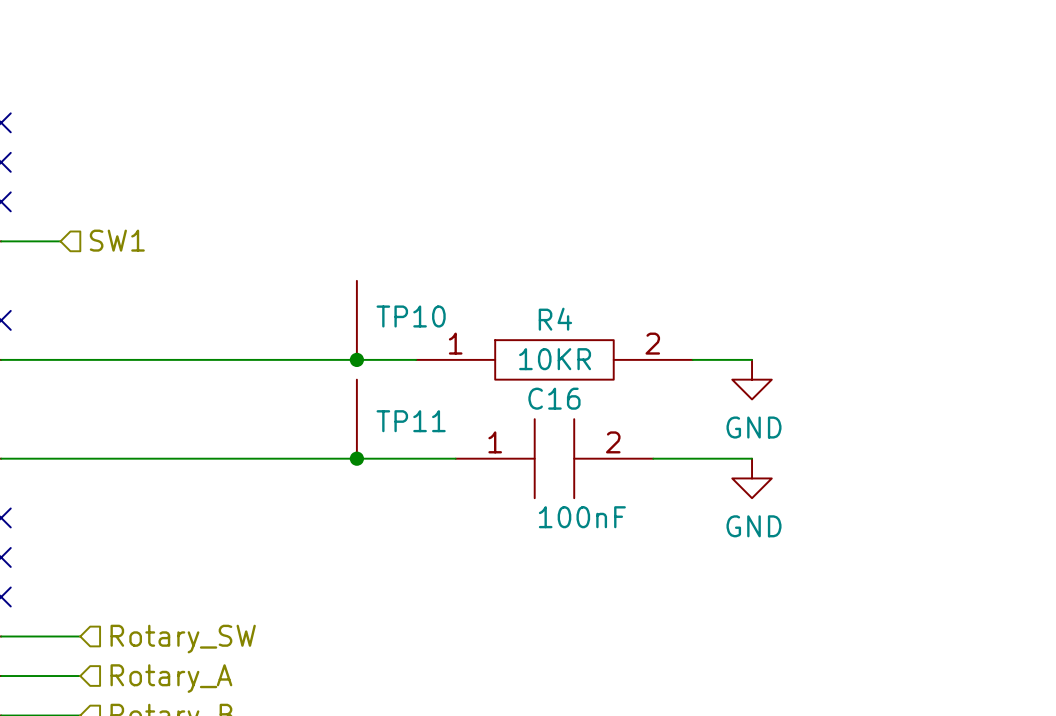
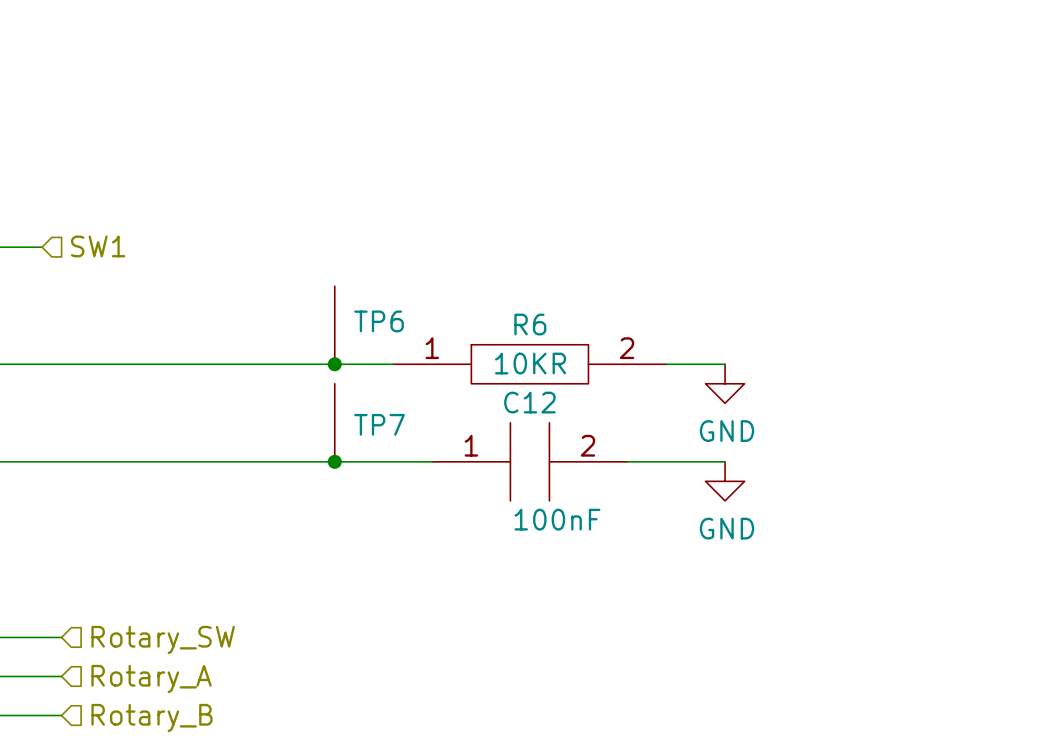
TP10 name: TP10 (411, 316) -> TP6 (379, 321)
R4 name: R4 (555, 319) -> R6 (530, 324)
C16 name: C16 (554, 398) -> C12 (529, 402)
TP11 name: TP11 (411, 421) -> TP7 (379, 424)

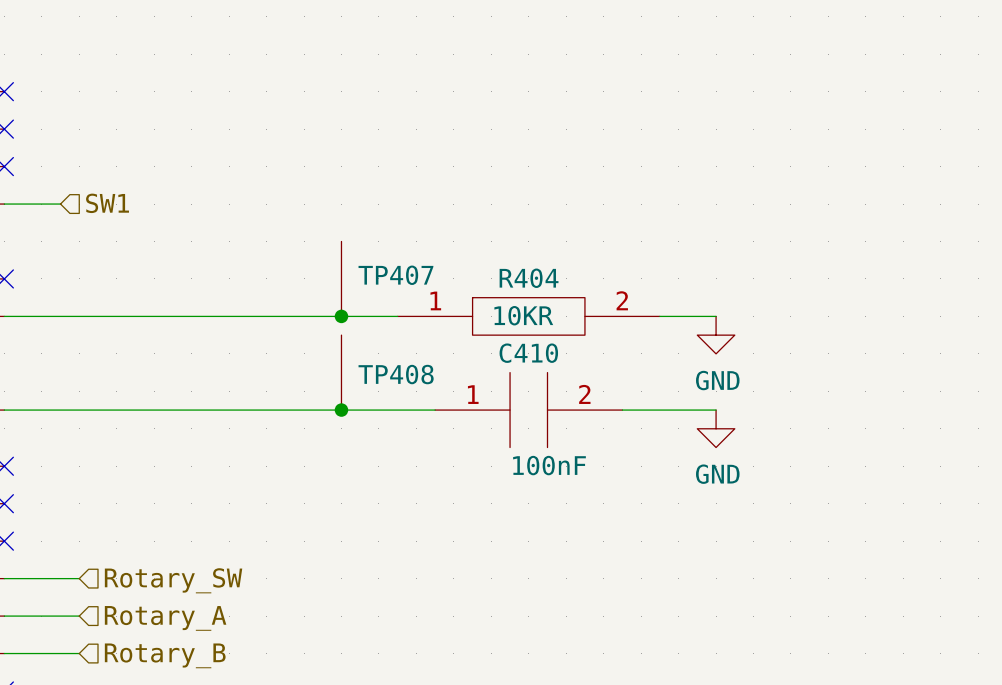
TP6 name: TP6 (379, 321) -> TP407 (395, 275)
R6 name: R6 (530, 324) -> R404 (529, 278)
C12 name: C12 (529, 402) -> C410 (528, 353)
TP7 name: TP7 (379, 424) -> TP408 (396, 374)

